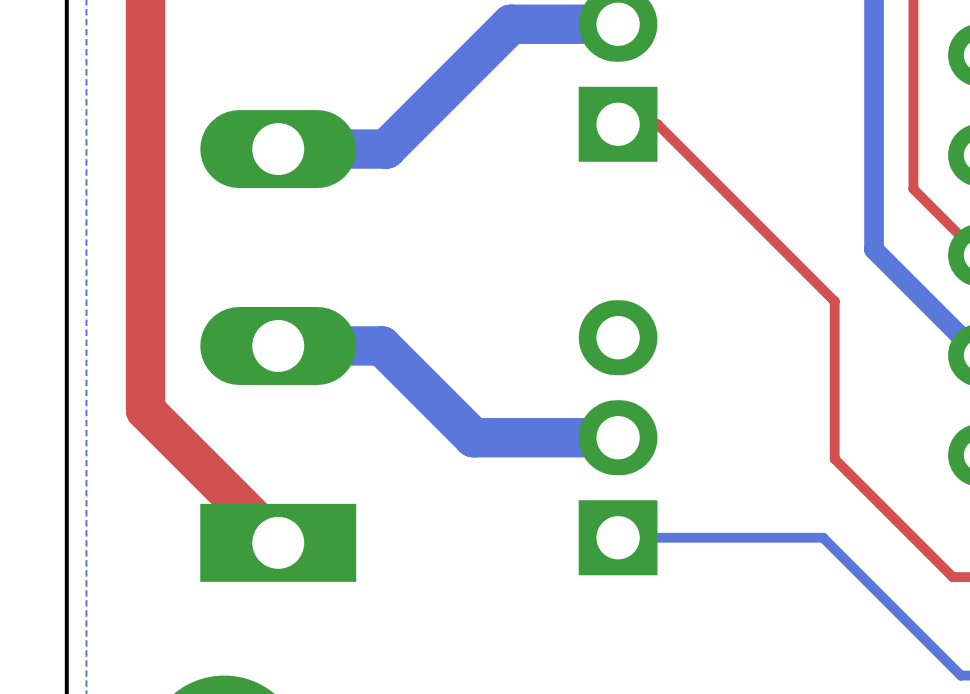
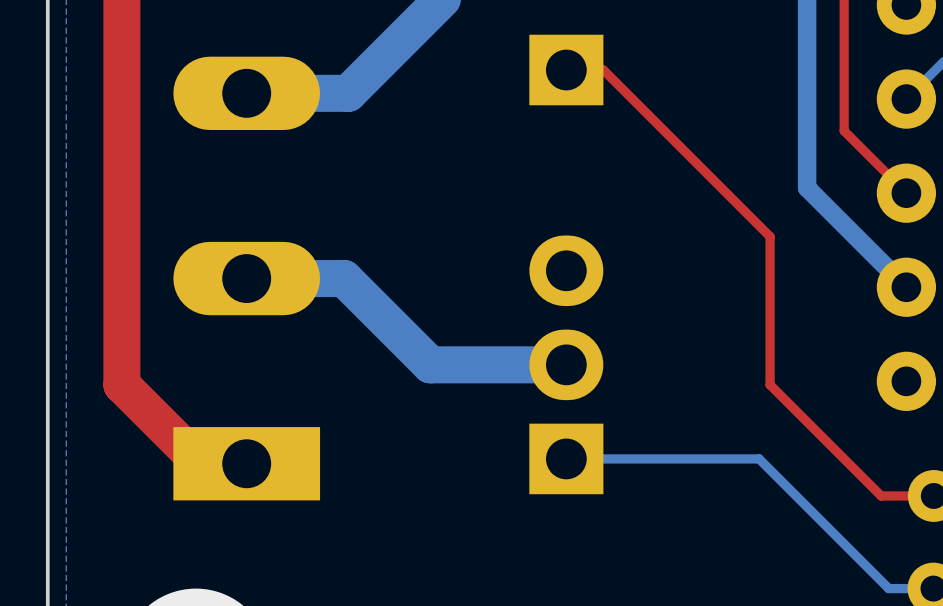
top track: (145, 410) (278, 542) -> (121, 338) (121, 384) (200, 463) (246, 463)

